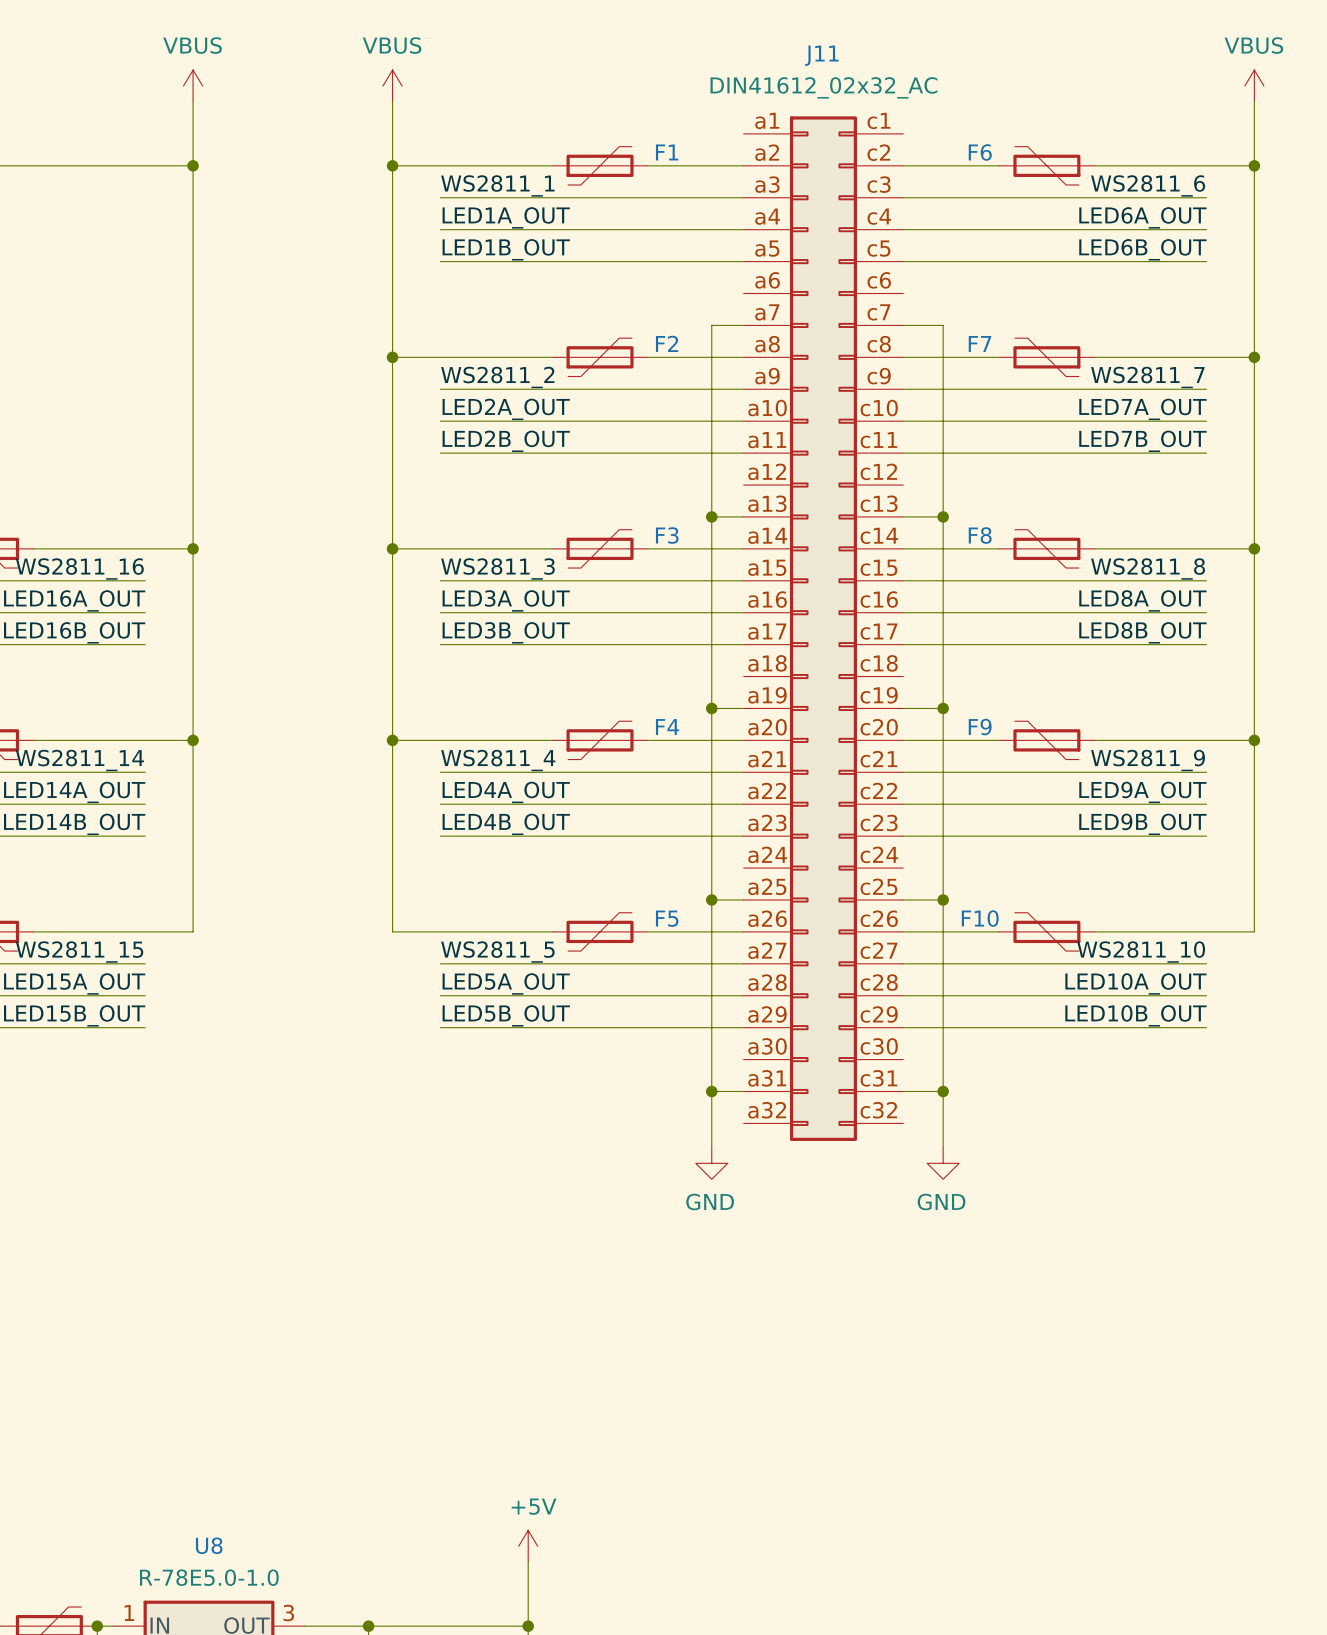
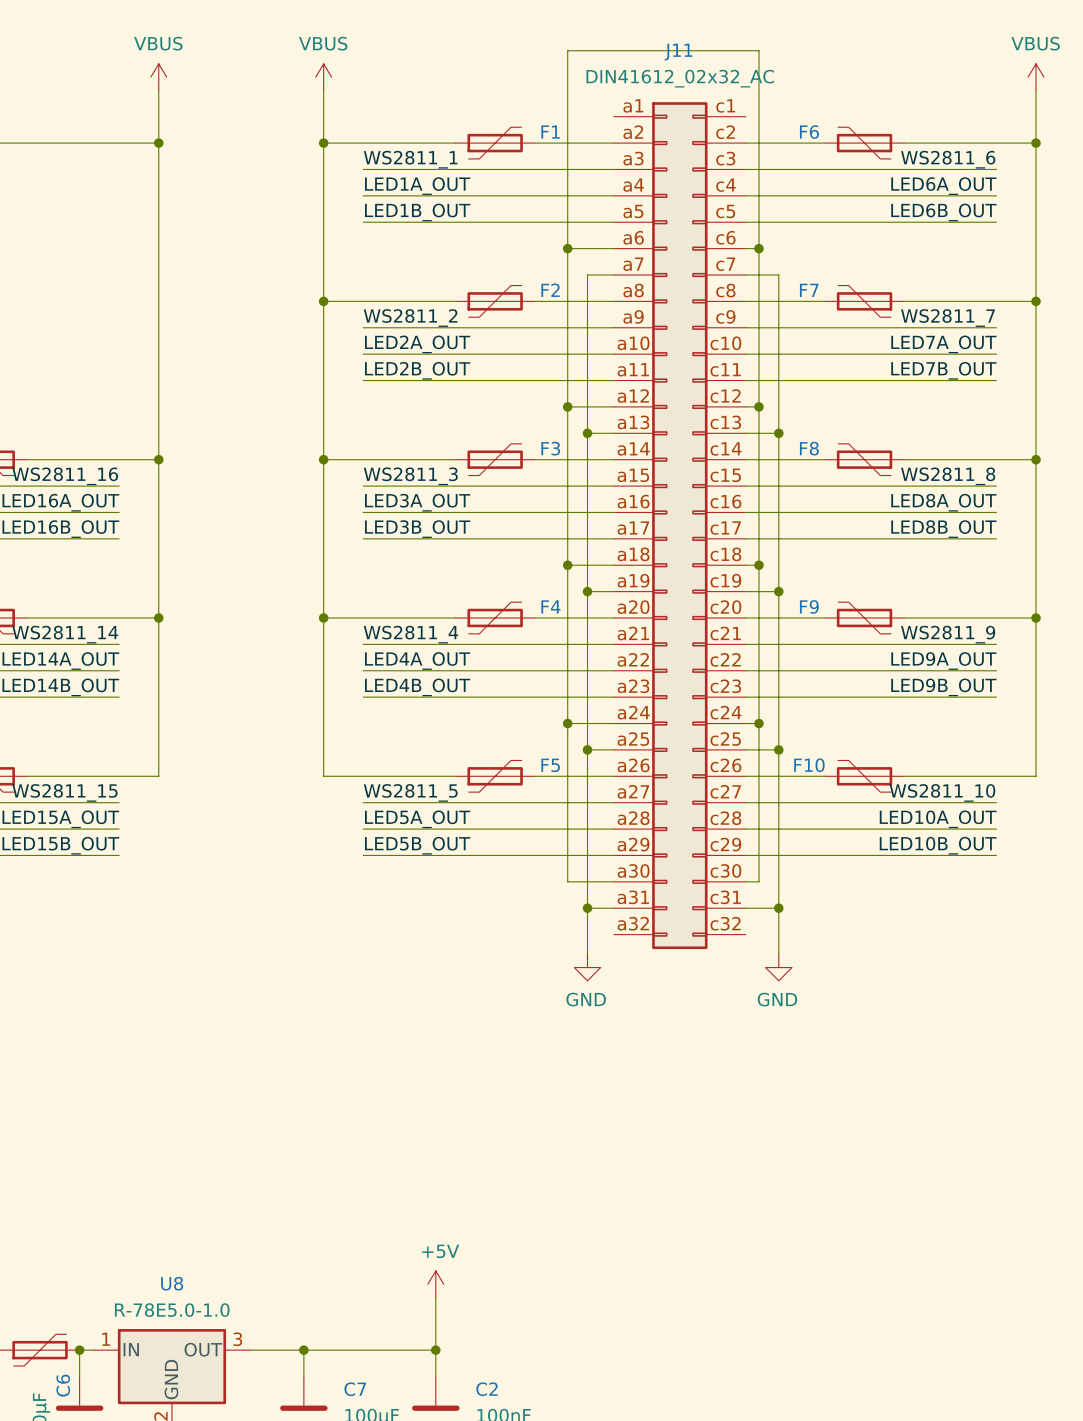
wire: none -> (567, 248) (613, 248)
junction: none -> (567, 248)
wire: none -> (745, 248) (758, 248)
junction: none -> (758, 248)
wire: none -> (567, 406) (613, 406)
junction: none -> (567, 406)
wire: none -> (745, 406) (758, 406)
junction: none -> (758, 406)
wire: none -> (567, 565) (613, 565)
junction: none -> (567, 565)
wire: none -> (745, 565) (758, 565)
junction: none -> (758, 565)
wire: none -> (567, 723) (613, 723)
junction: none -> (567, 723)
wire: none -> (745, 723) (758, 723)
junction: none -> (758, 723)
wire: none -> (613, 881) (567, 881) (567, 50) (758, 50) (758, 881) (745, 881)

